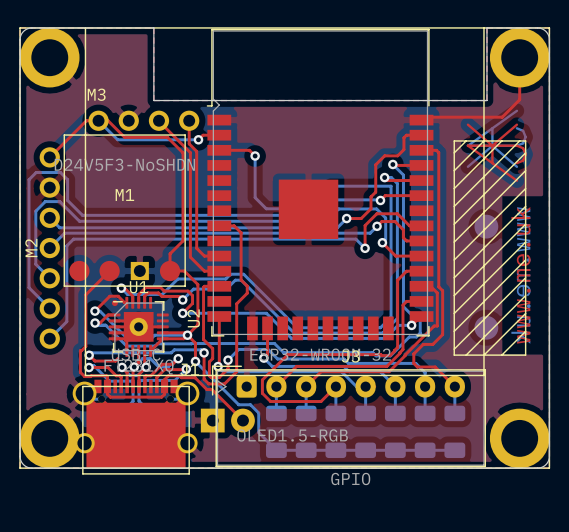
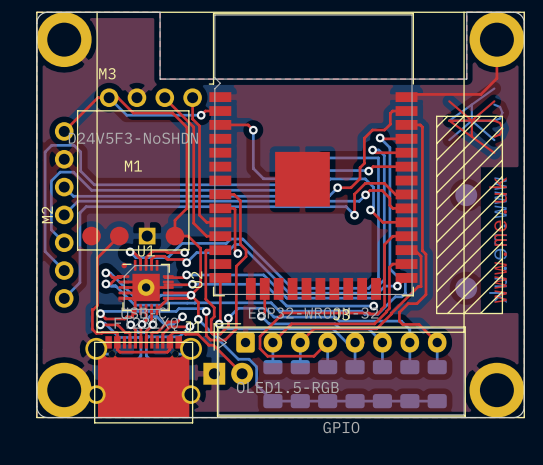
top track: none -> (220, 208) (235, 209) (235, 250) (237, 253)
top track: (162, 288) (164, 291) (188, 291) (192, 295) (192, 303) (182, 313) -> (167, 252) (184, 252)
via: none -> (184, 252)
via: none -> (237, 253)
top track: (126, 302) (118, 296) (109, 296) (94, 311) -> (120, 277) (112, 277) (105, 272)
top track: none -> (186, 274) (183, 277) (164, 277)
top track: none -> (192, 284) (164, 284)
bottom track: none -> (192, 284) (265, 284) (286, 306) (373, 306)
via: none -> (192, 284)
via: none -> (373, 306)
top track: none -> (132, 310) (132, 316) (126, 316)

